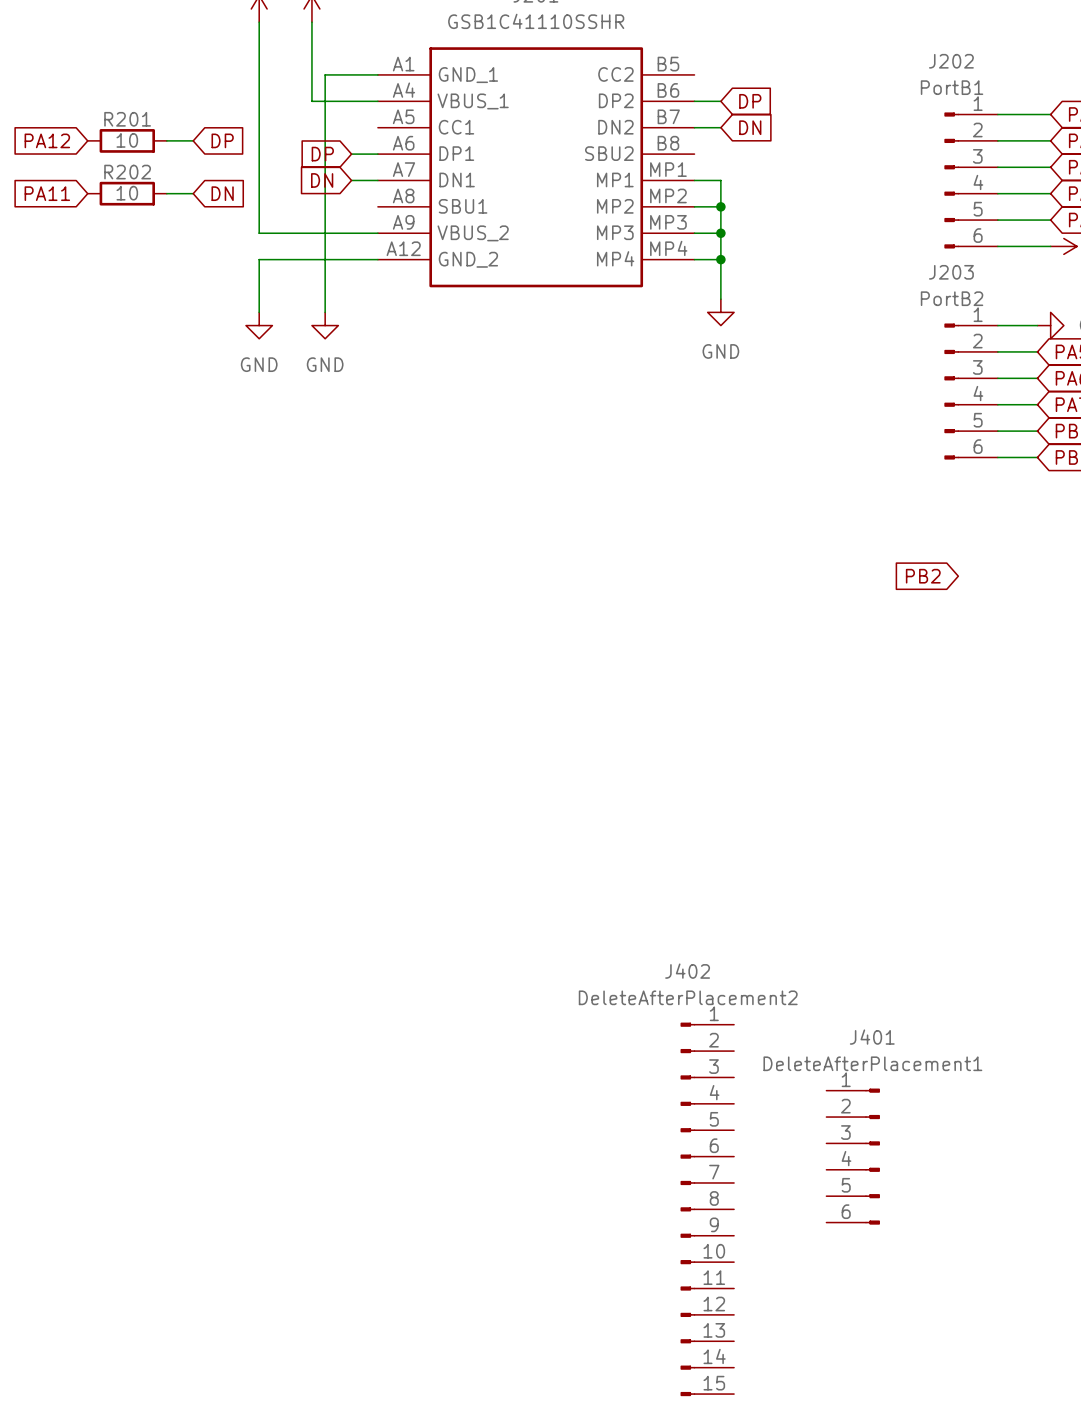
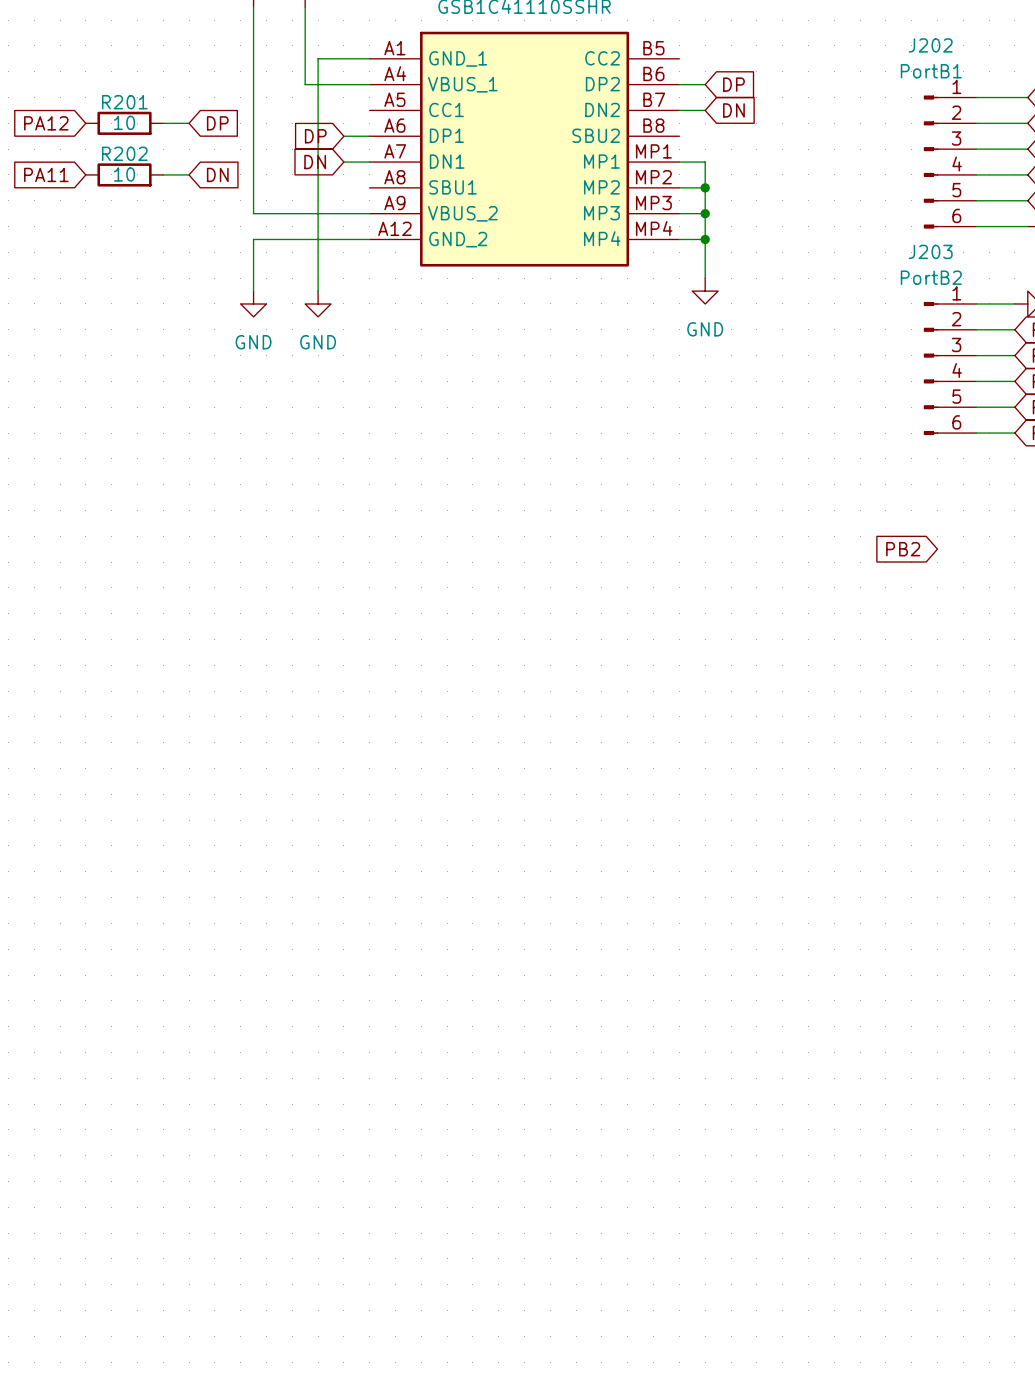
J401: DeleteAfterPlacement1 (853, 1156) -> none
J402: DeleteAfterPlacement2 (707, 1209) -> none

